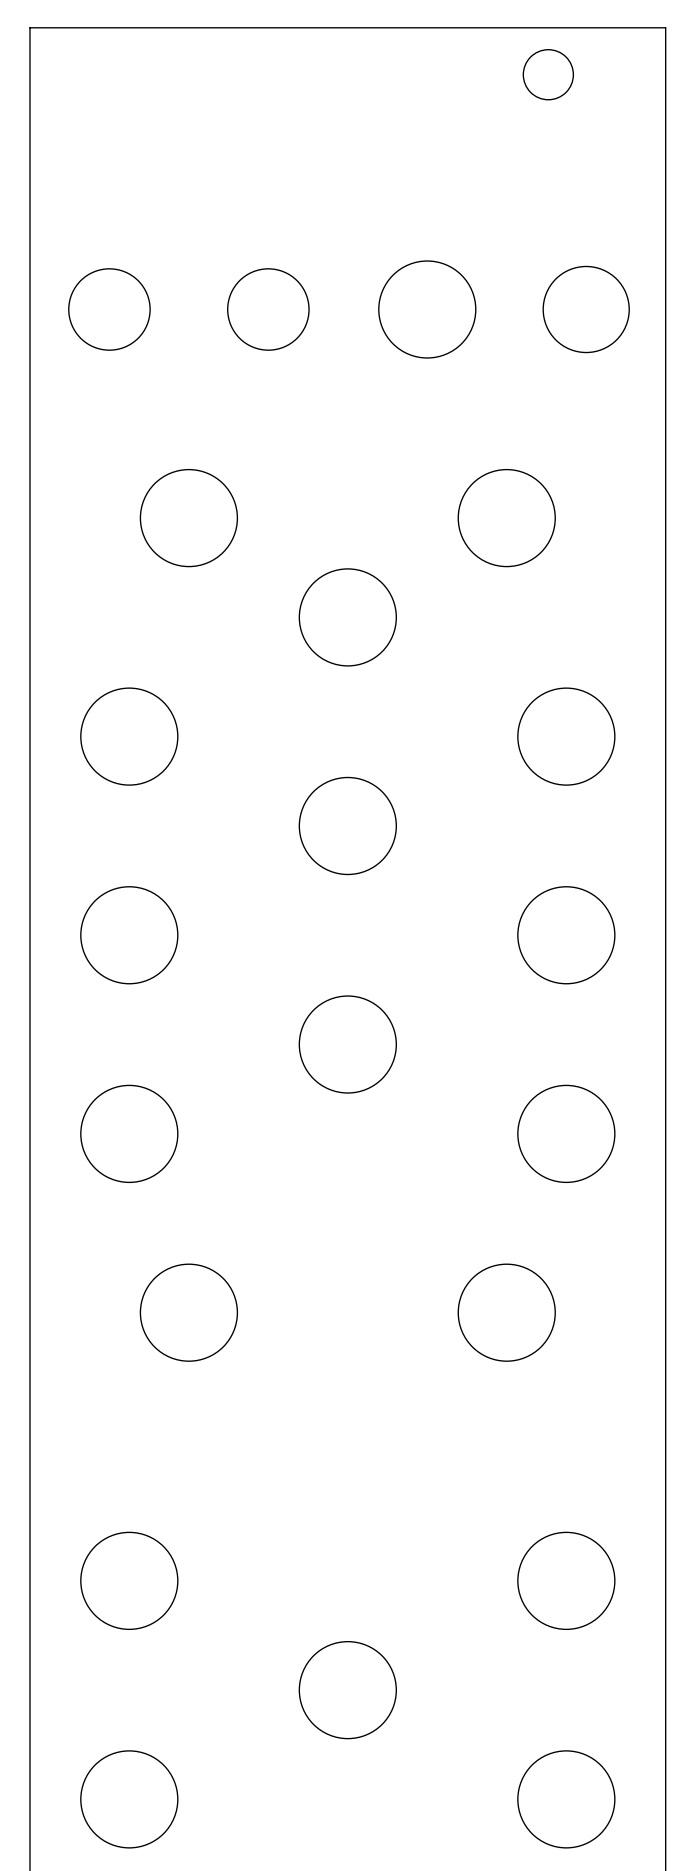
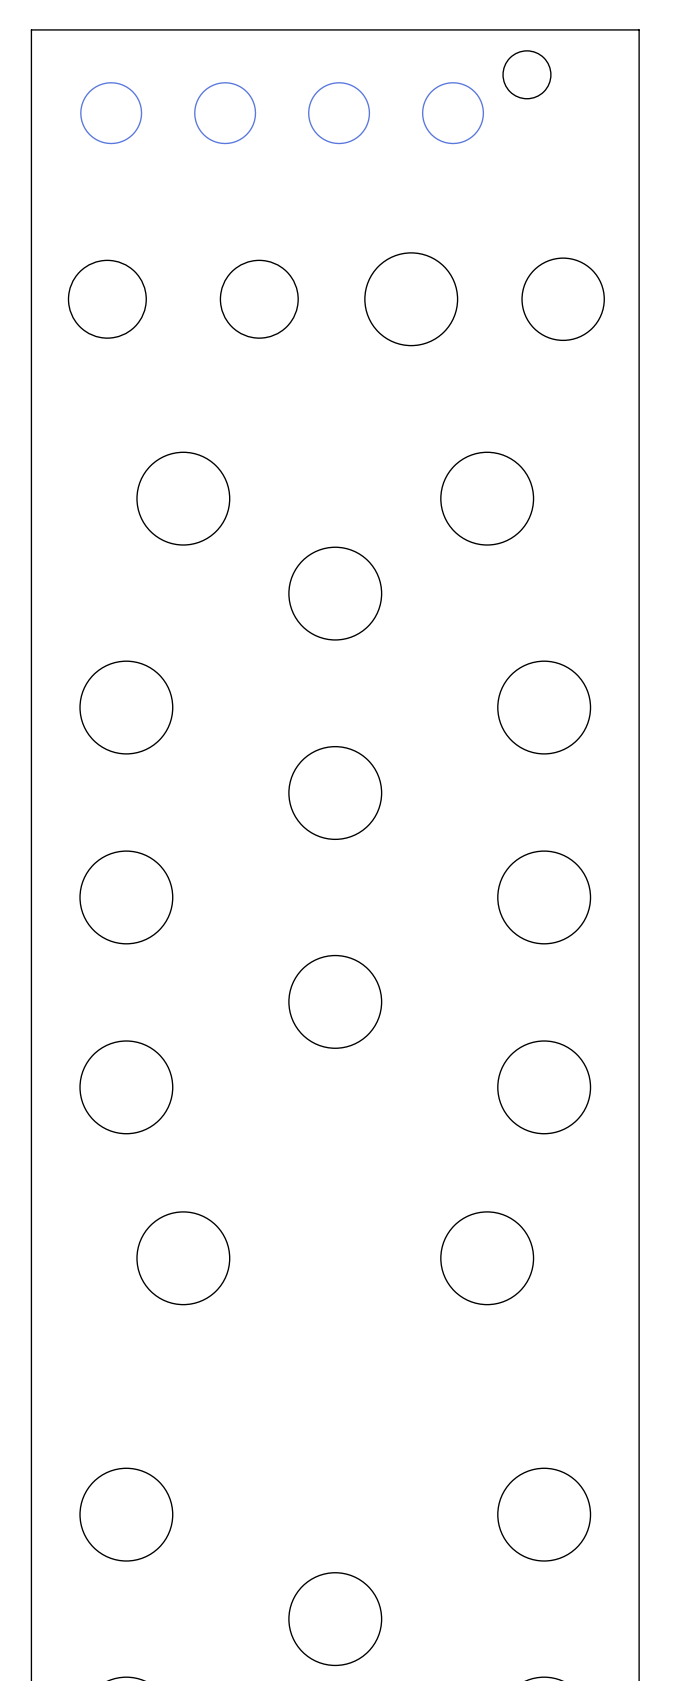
bottom zone outline: none -> (111, 82) (99, 85) (89, 91) (83, 101) (80, 113) (83, 124) (89, 134) (99, 141) (111, 143) (122, 141) (132, 134) (139, 124) (141, 113) (139, 101) (132, 91) (122, 85) (111, 82)
bottom zone outline: none -> (225, 82) (213, 85) (203, 91) (197, 101) (194, 113) (197, 124) (203, 134) (213, 141) (225, 143) (236, 141) (246, 134) (253, 124) (255, 113) (253, 101) (246, 91) (236, 85) (225, 82)
bottom zone outline: none -> (339, 82) (327, 85) (317, 91) (310, 101) (308, 113) (310, 124) (317, 134) (327, 141) (339, 143) (350, 141) (360, 134) (367, 124) (369, 113) (367, 101) (360, 91) (350, 85) (339, 82)
bottom zone outline: none -> (453, 82) (441, 85) (431, 91) (424, 101) (422, 113) (424, 124) (431, 134) (441, 141) (453, 143) (464, 141) (474, 134) (481, 124) (483, 113) (481, 101) (474, 91) (464, 85) (453, 82)

